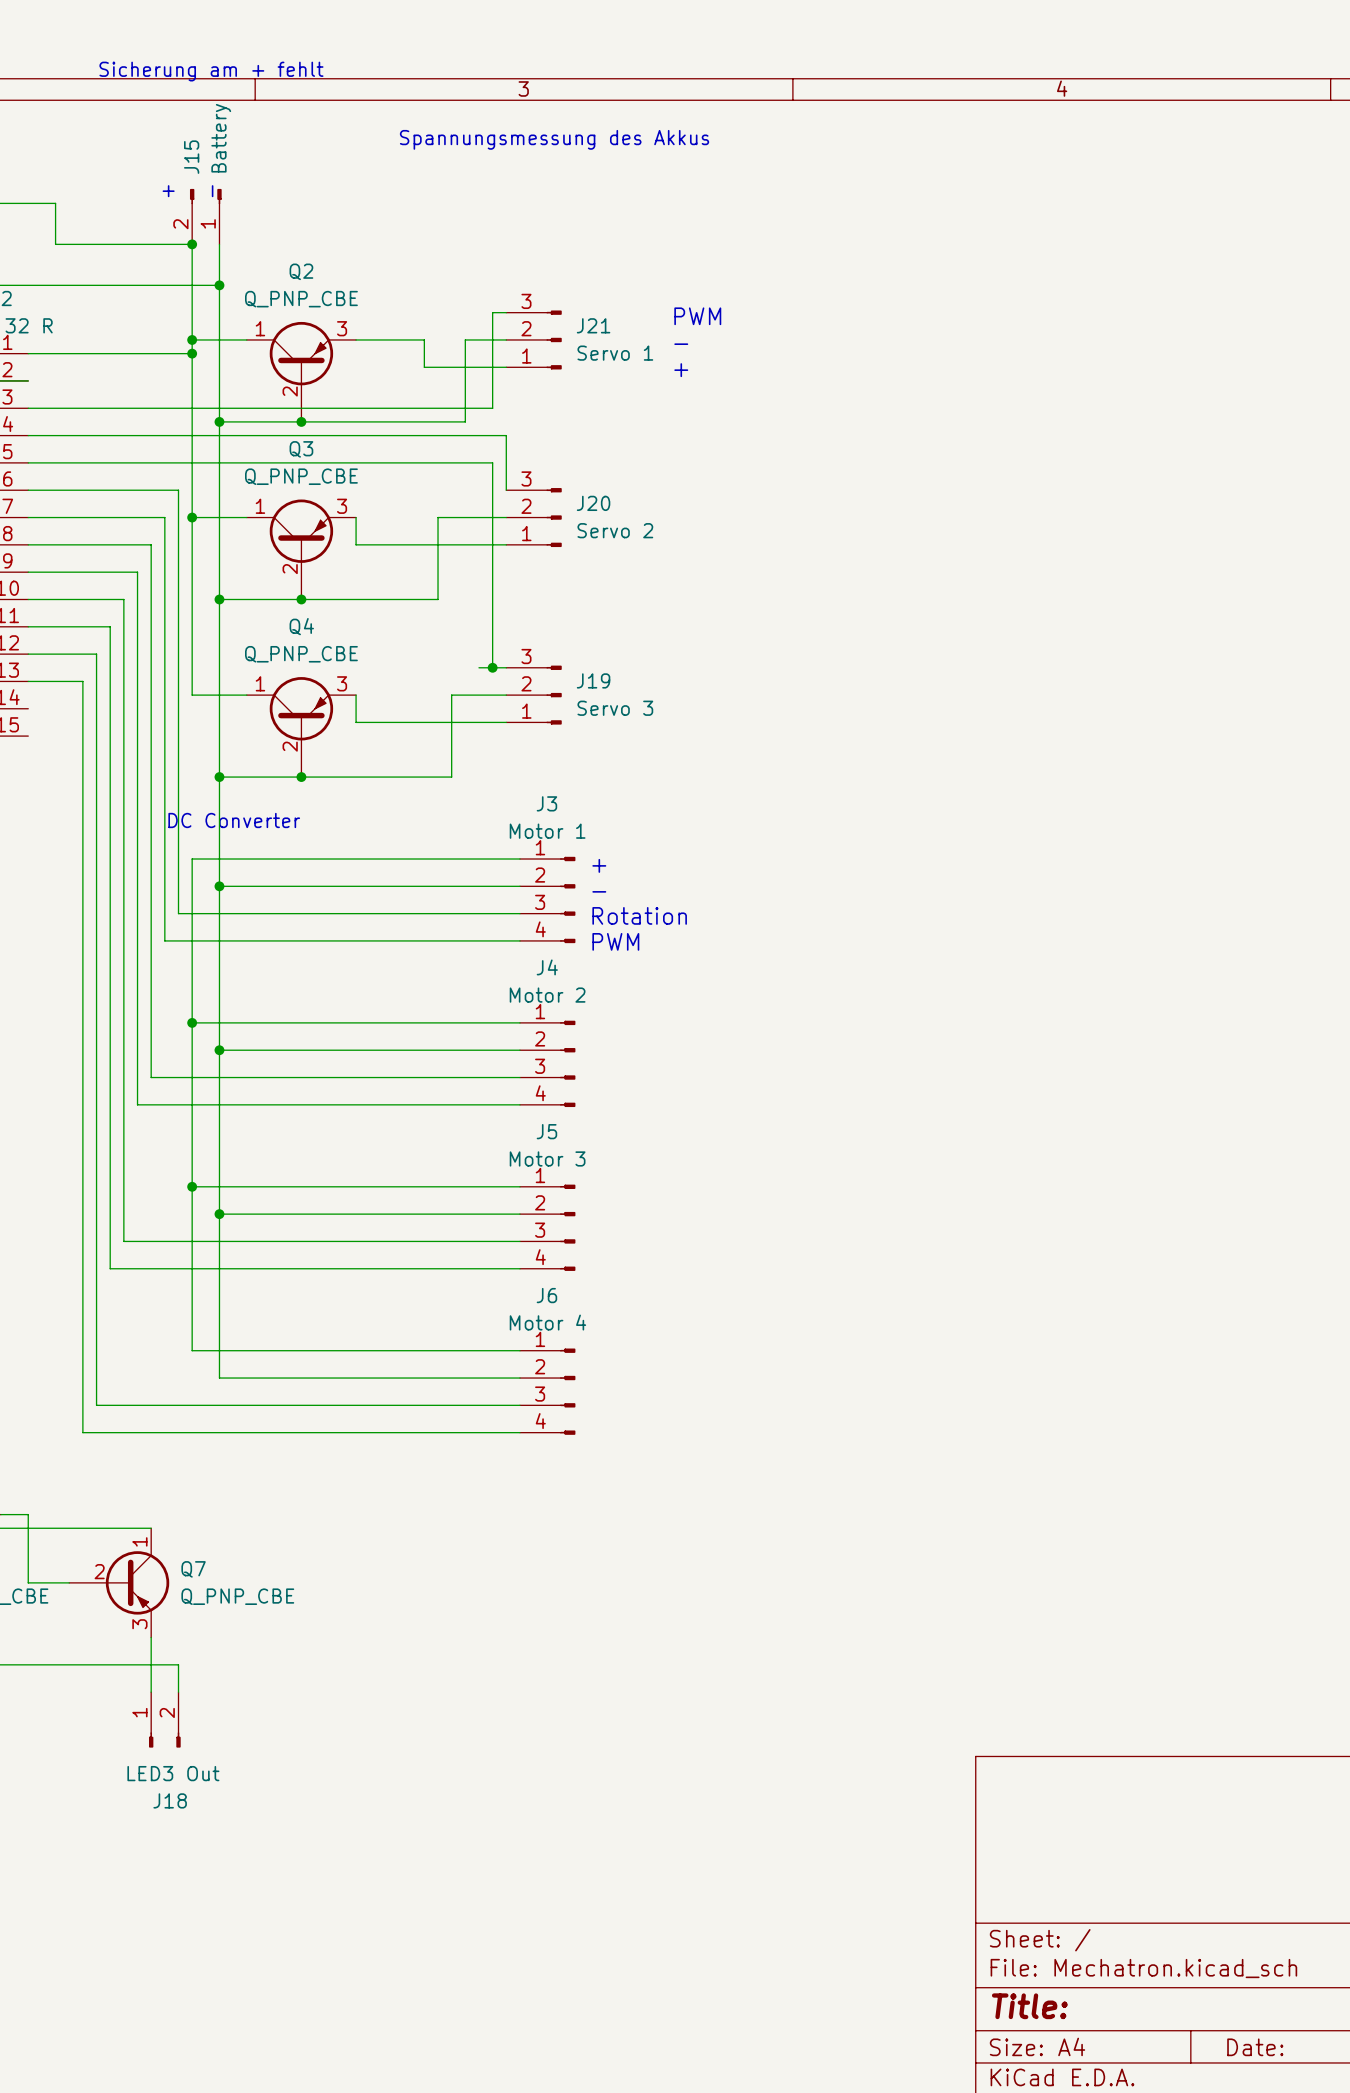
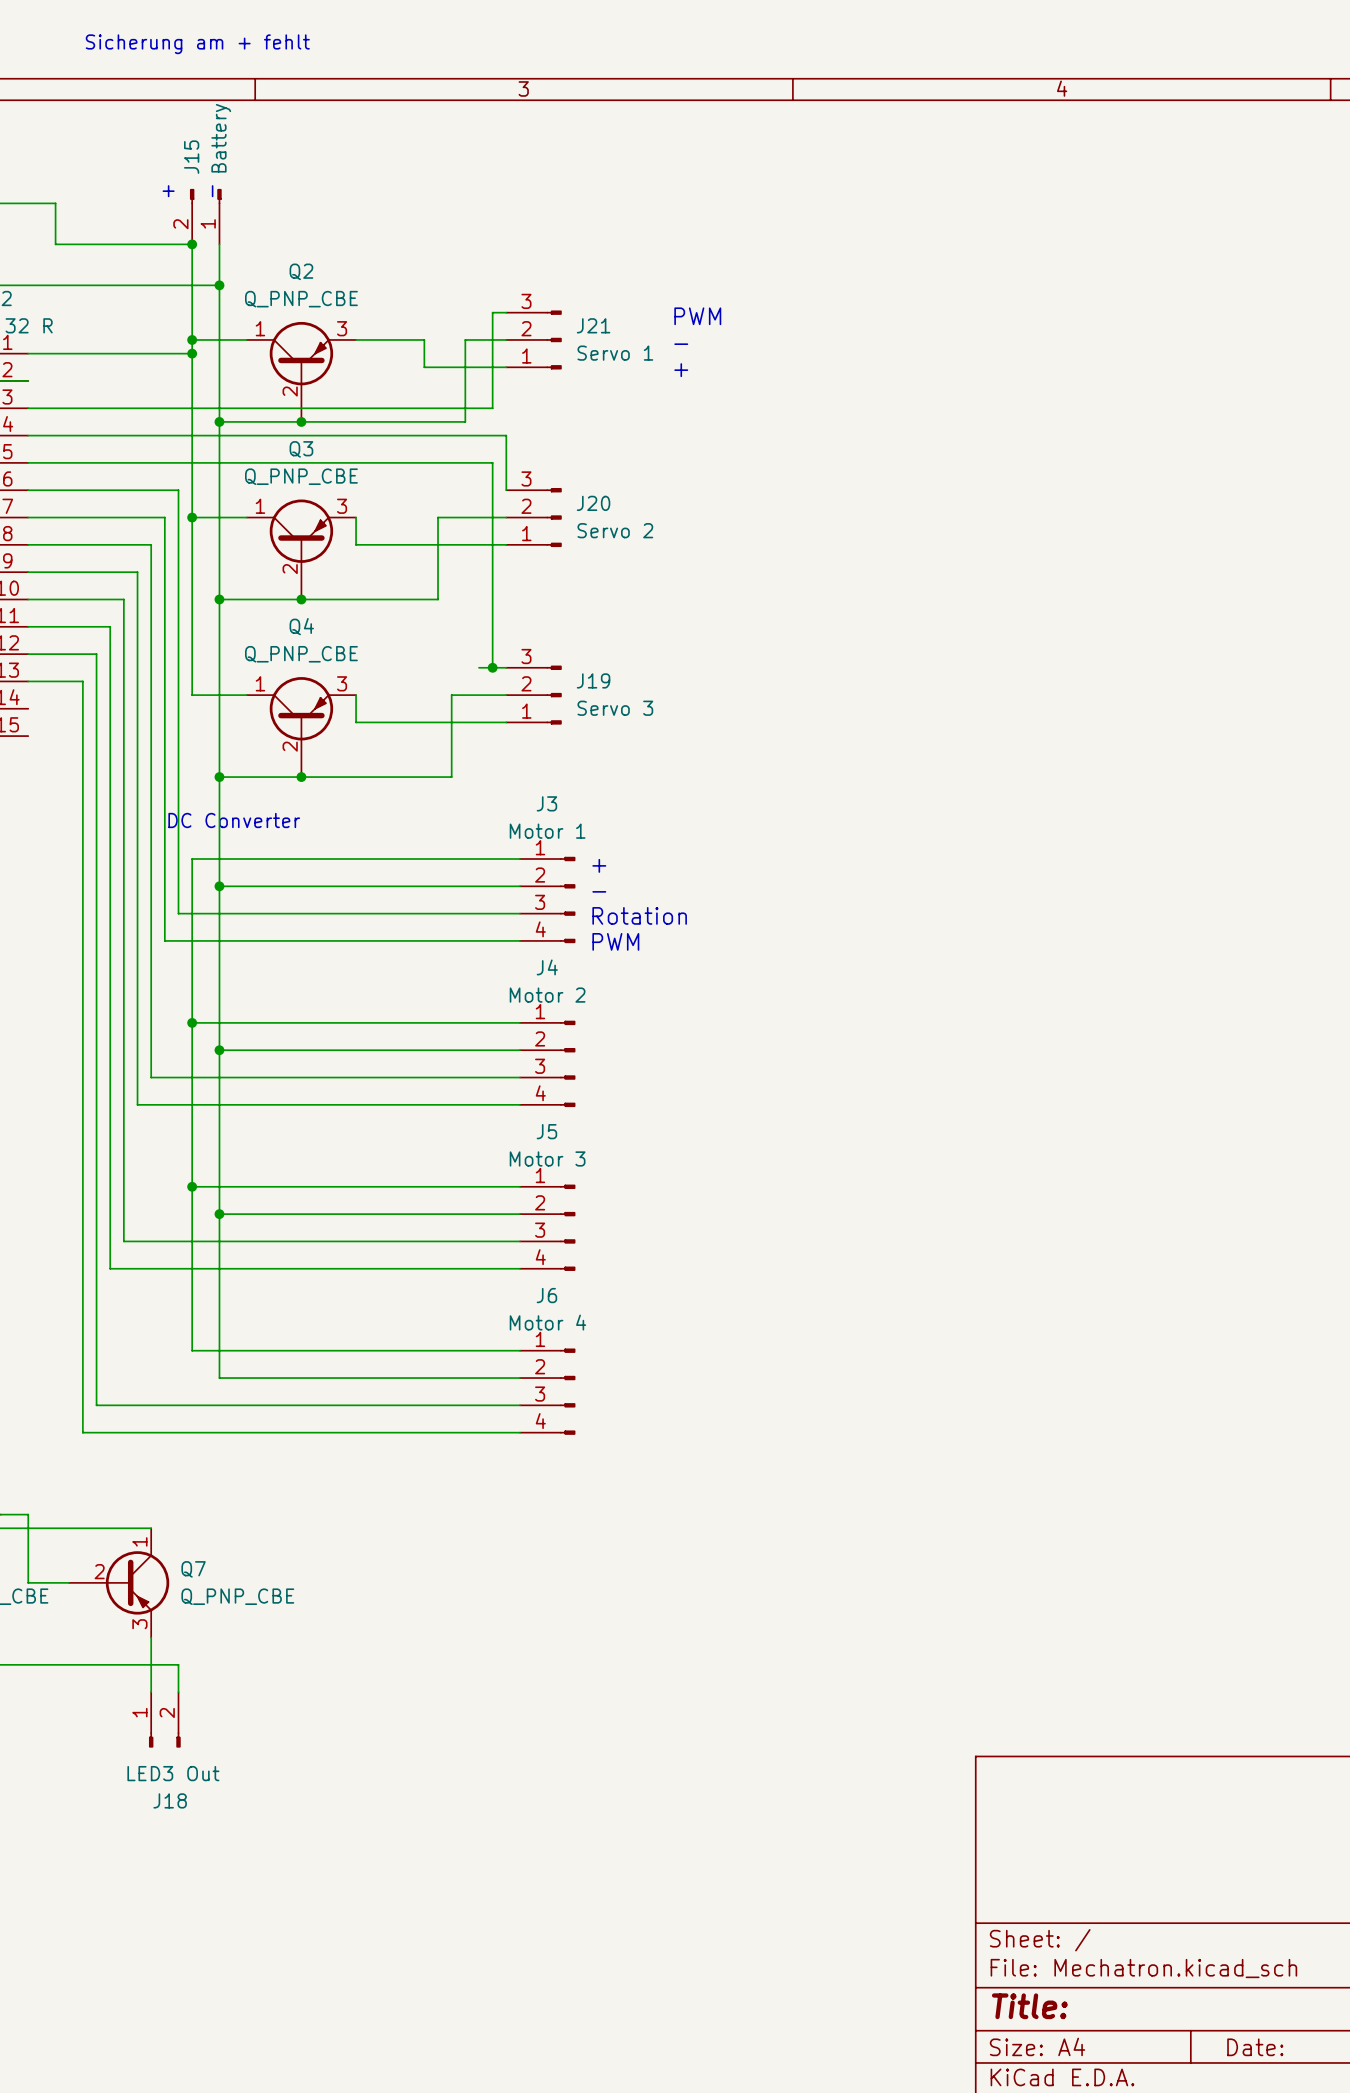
text position: Sicherung am + fehlt (211, 71) -> Sicherung am + fehlt (197, 44)
text: Spannungsmessung des Akkus (554, 139) -> none

